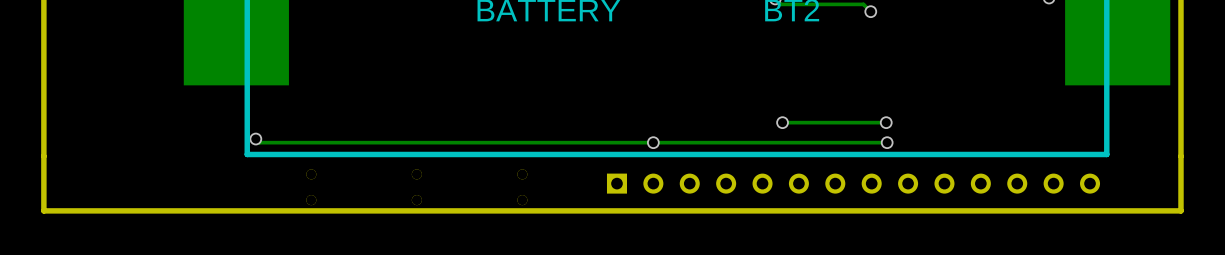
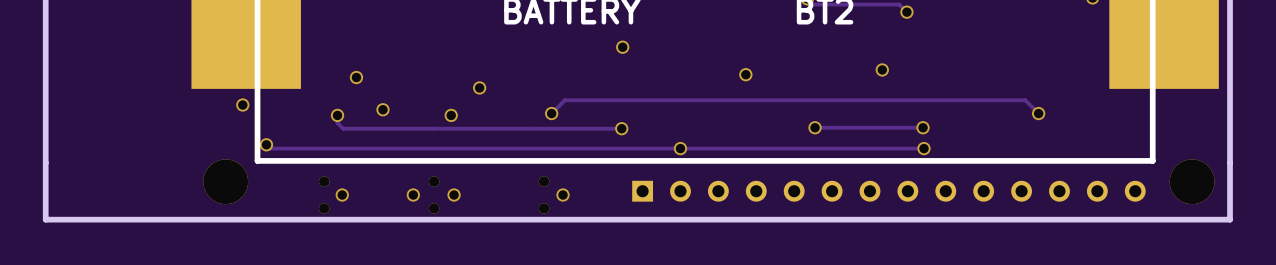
via: none -> (622, 47)
via: none -> (882, 69)
via: none -> (745, 74)
via: none -> (356, 77)
via: none -> (479, 87)
via: none -> (242, 105)
via: none -> (383, 109)
via: none -> (551, 113)
track: none -> (1038, 113) (1025, 100) (564, 100) (551, 113)
via: none -> (1038, 113)
track: none -> (337, 115) (337, 123) (343, 128) (621, 128)
via: none -> (337, 115)
via: none -> (451, 115)
via: none -> (621, 128)
part: none -> (225, 181)
part: none -> (1192, 181)
via: none -> (342, 195)
via: none -> (413, 195)
via: none -> (454, 195)
via: none -> (563, 195)

